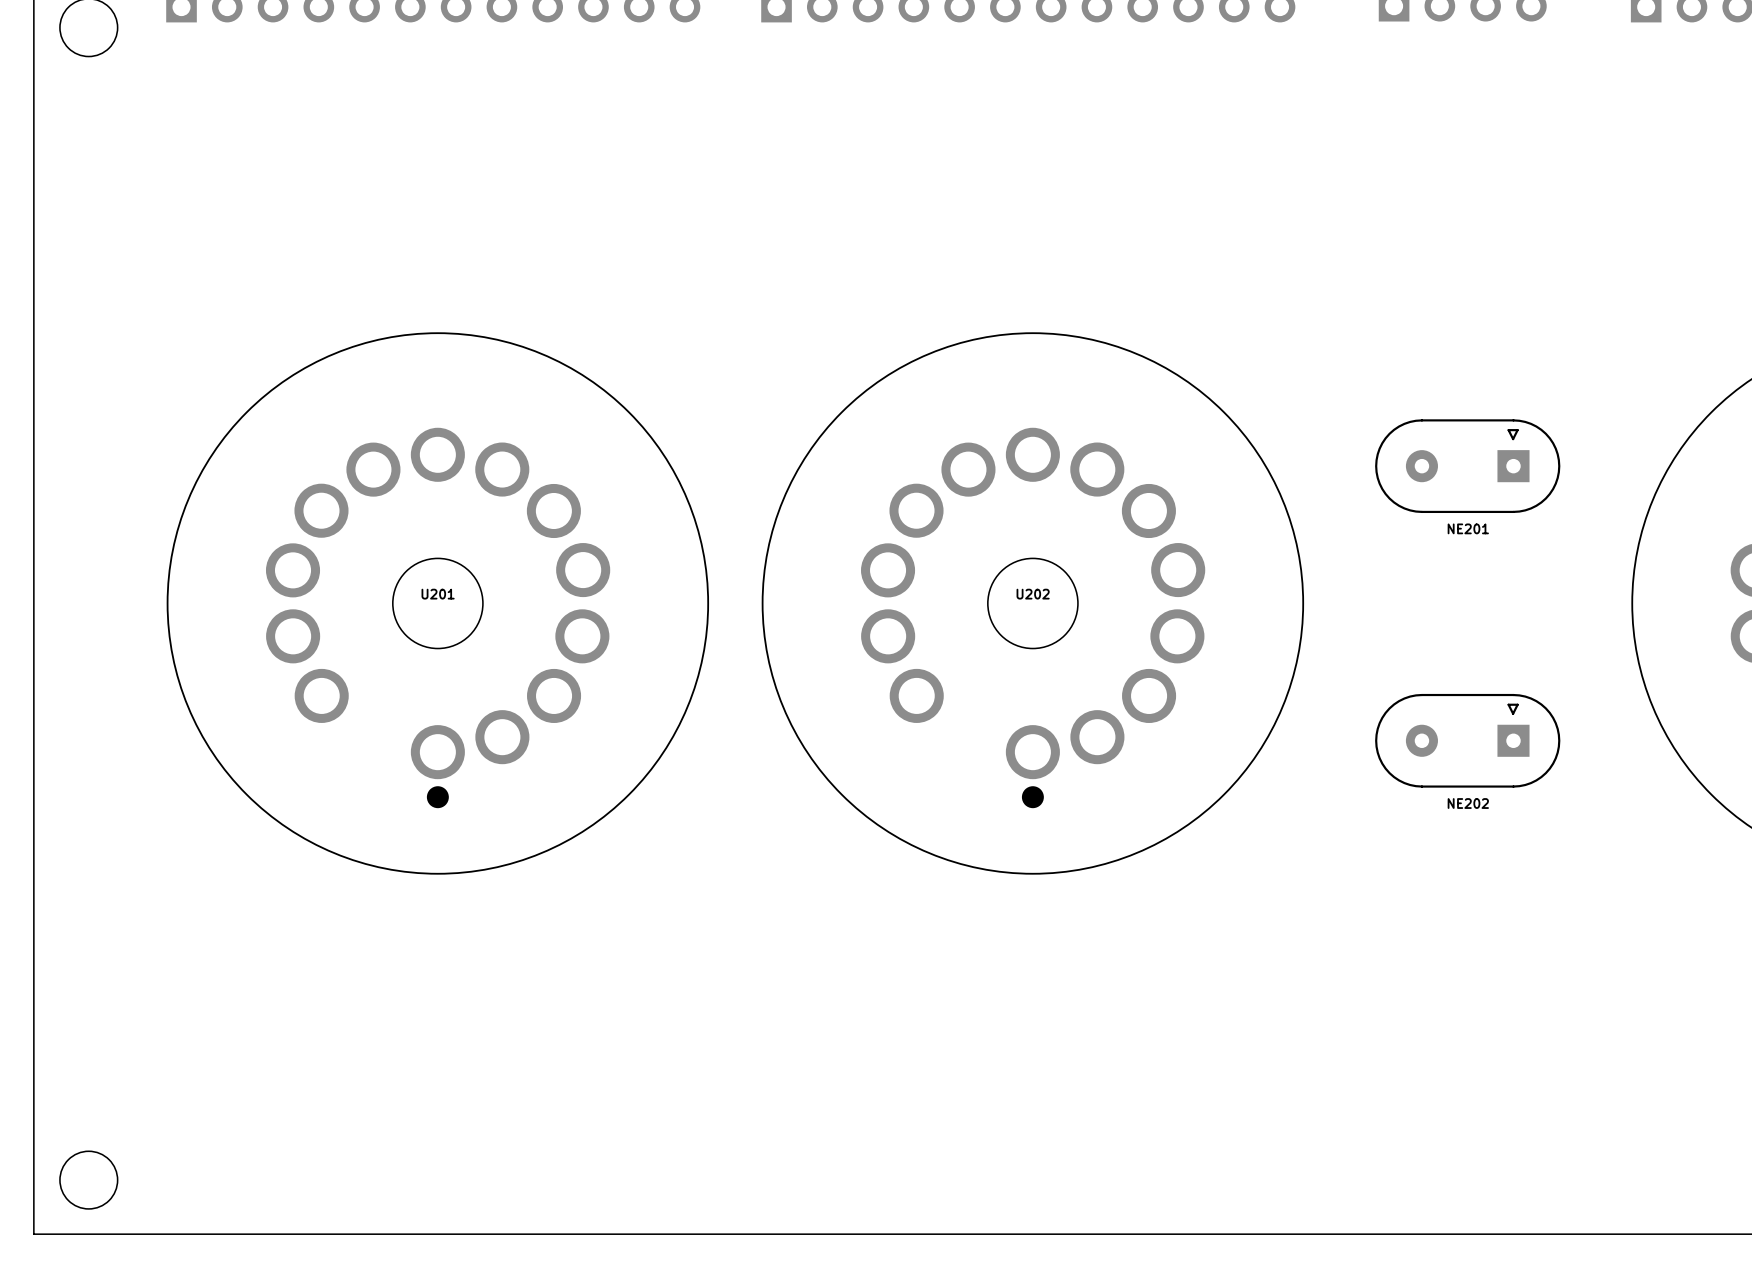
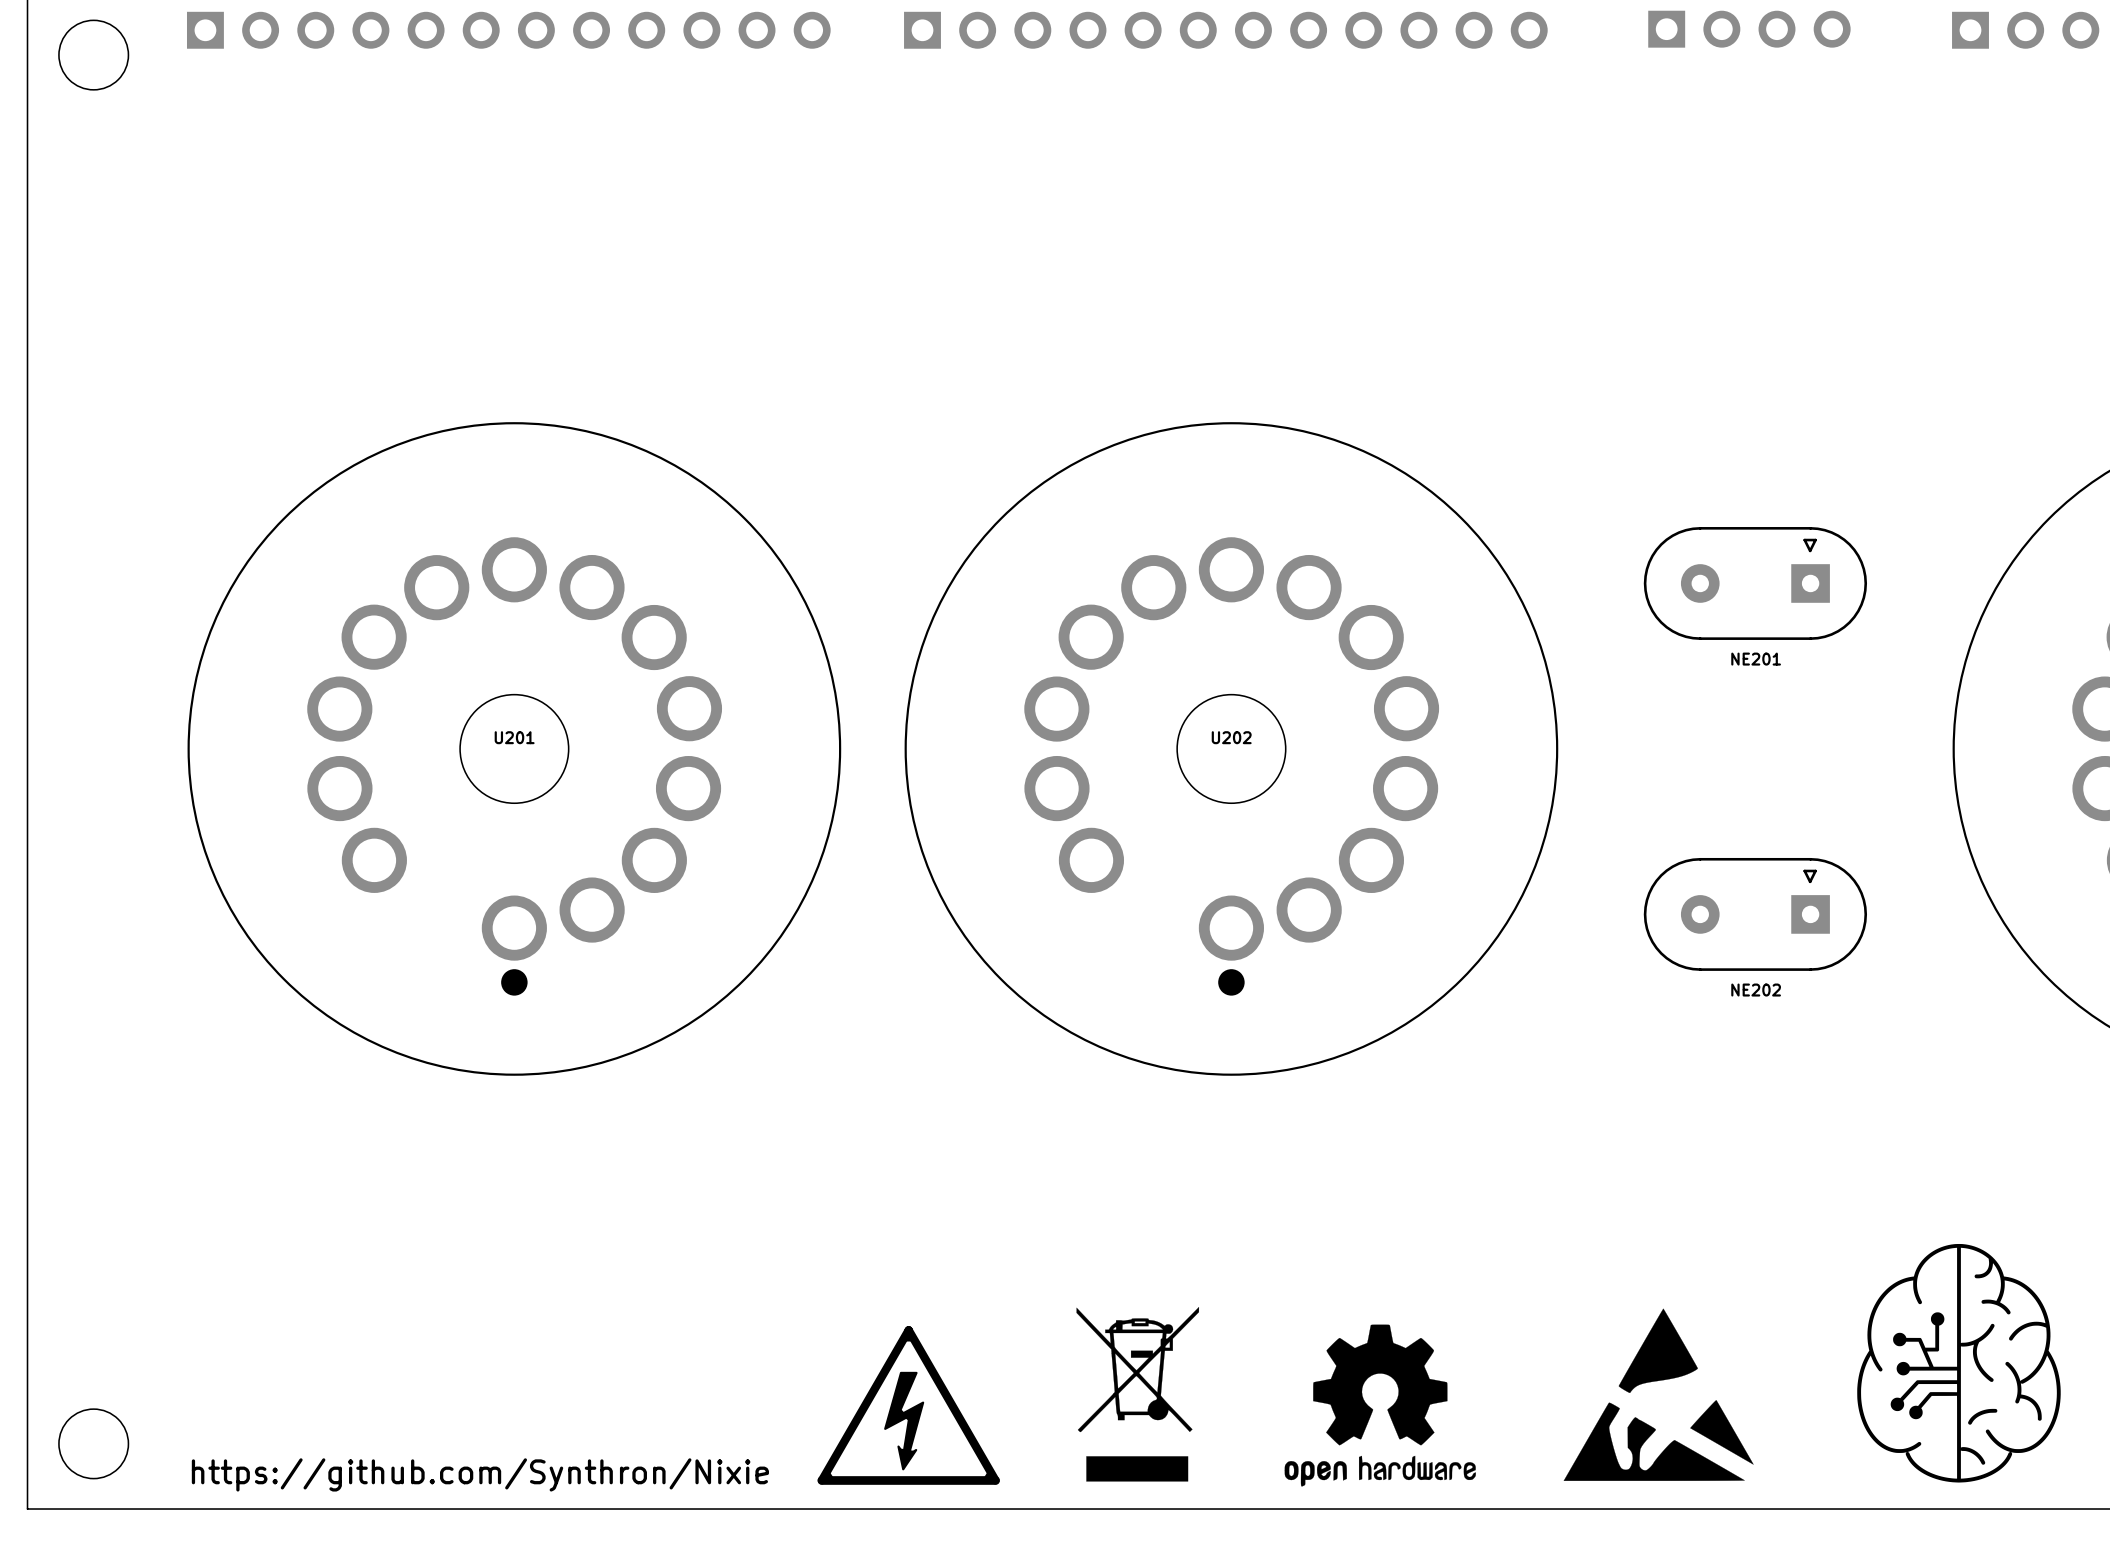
drawing: none -> [1857, 1243, 2061, 1483]
drawing: none -> [1076, 1306, 1200, 1482]
drawing: none -> [1563, 1308, 1754, 1481]
drawing: none -> [1284, 1324, 1476, 1487]
drawing: none -> [817, 1326, 1000, 1485]
text: none -> https://github.com/Synthron/Nixie (480, 1474)

